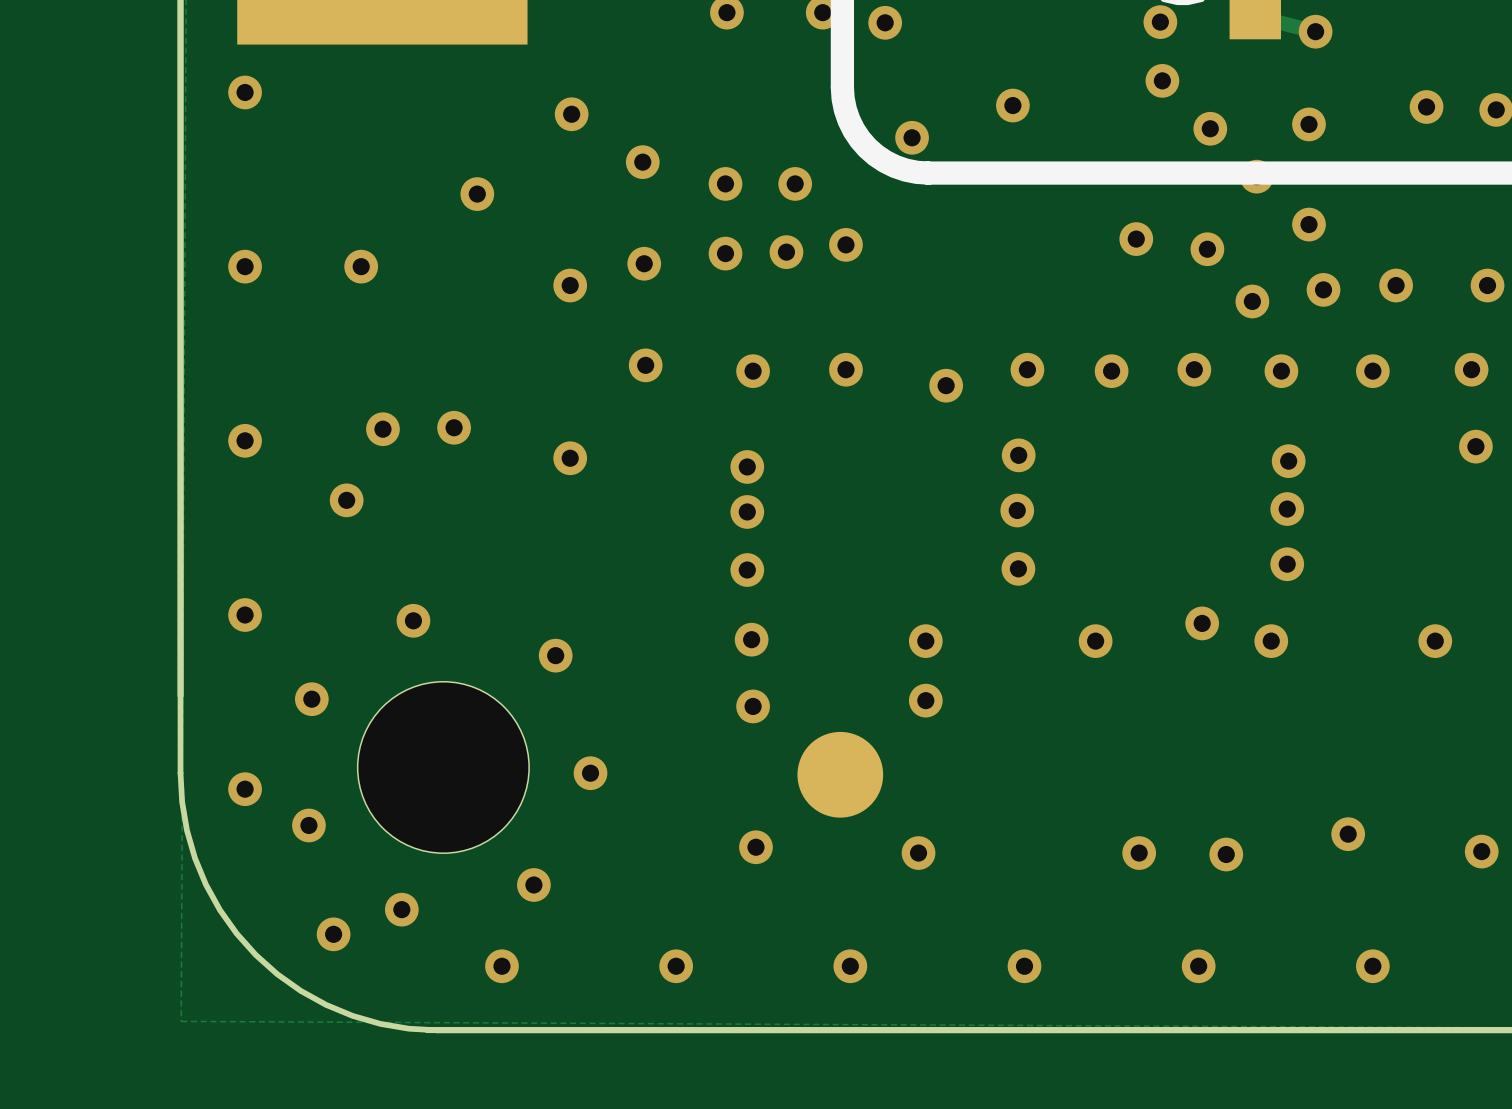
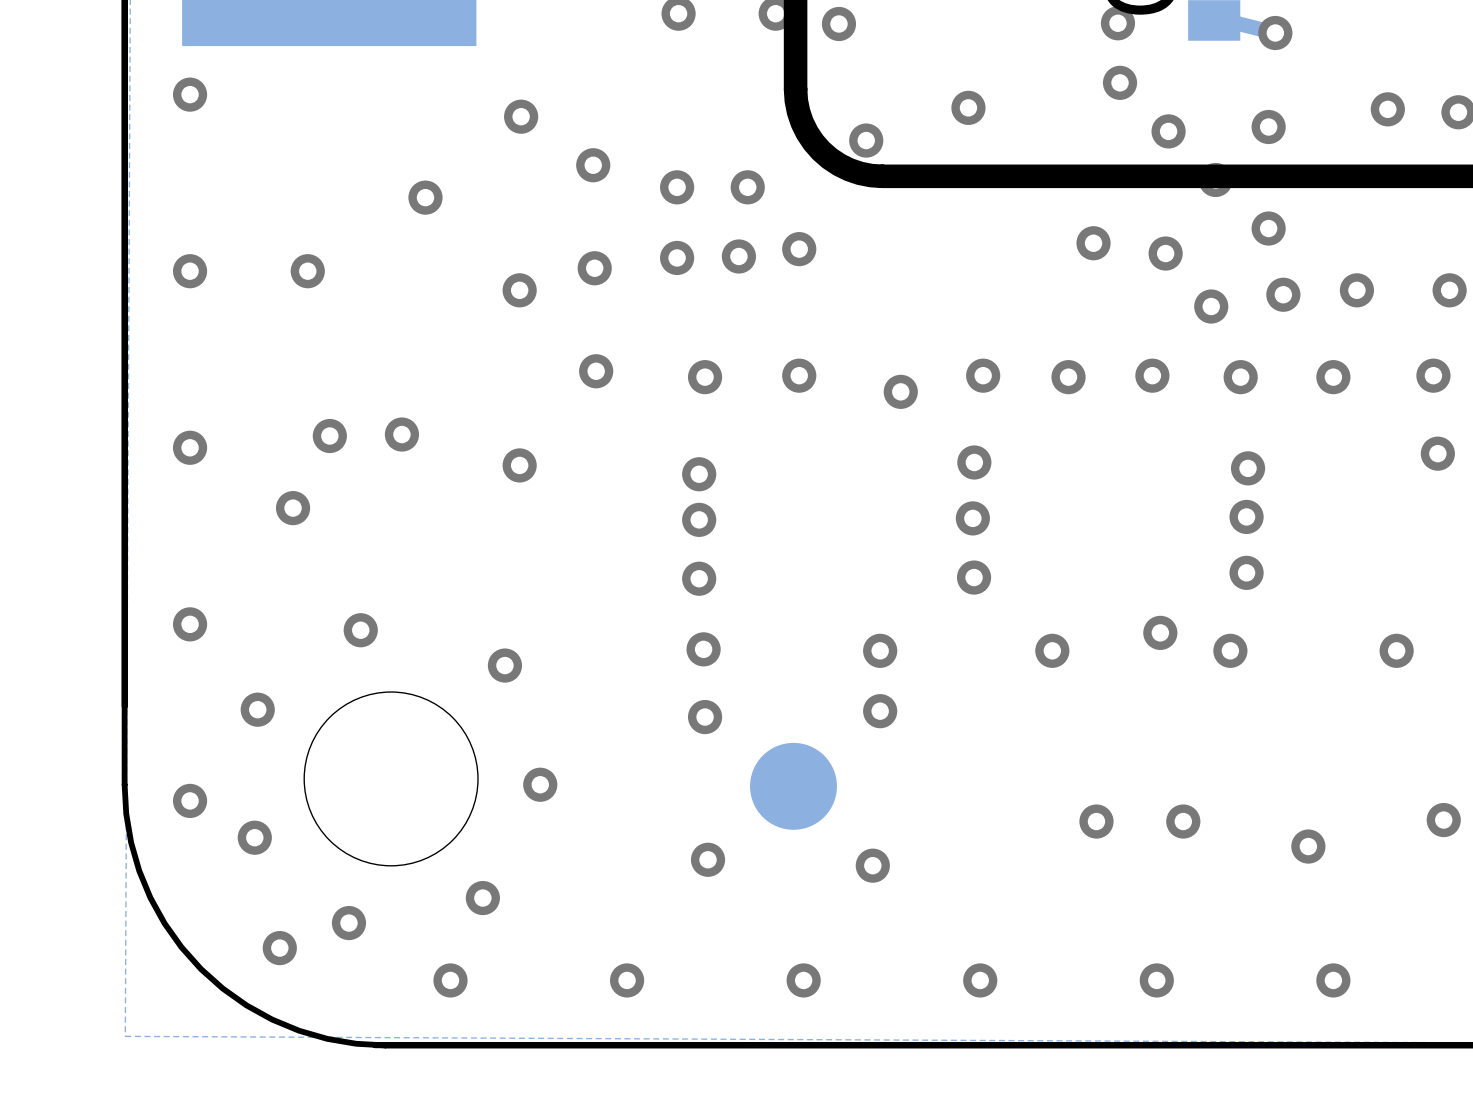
via position: (1481, 851) -> (1443, 820)
via position: (1139, 853) -> (1096, 821)
via position: (1226, 854) -> (1183, 821)

